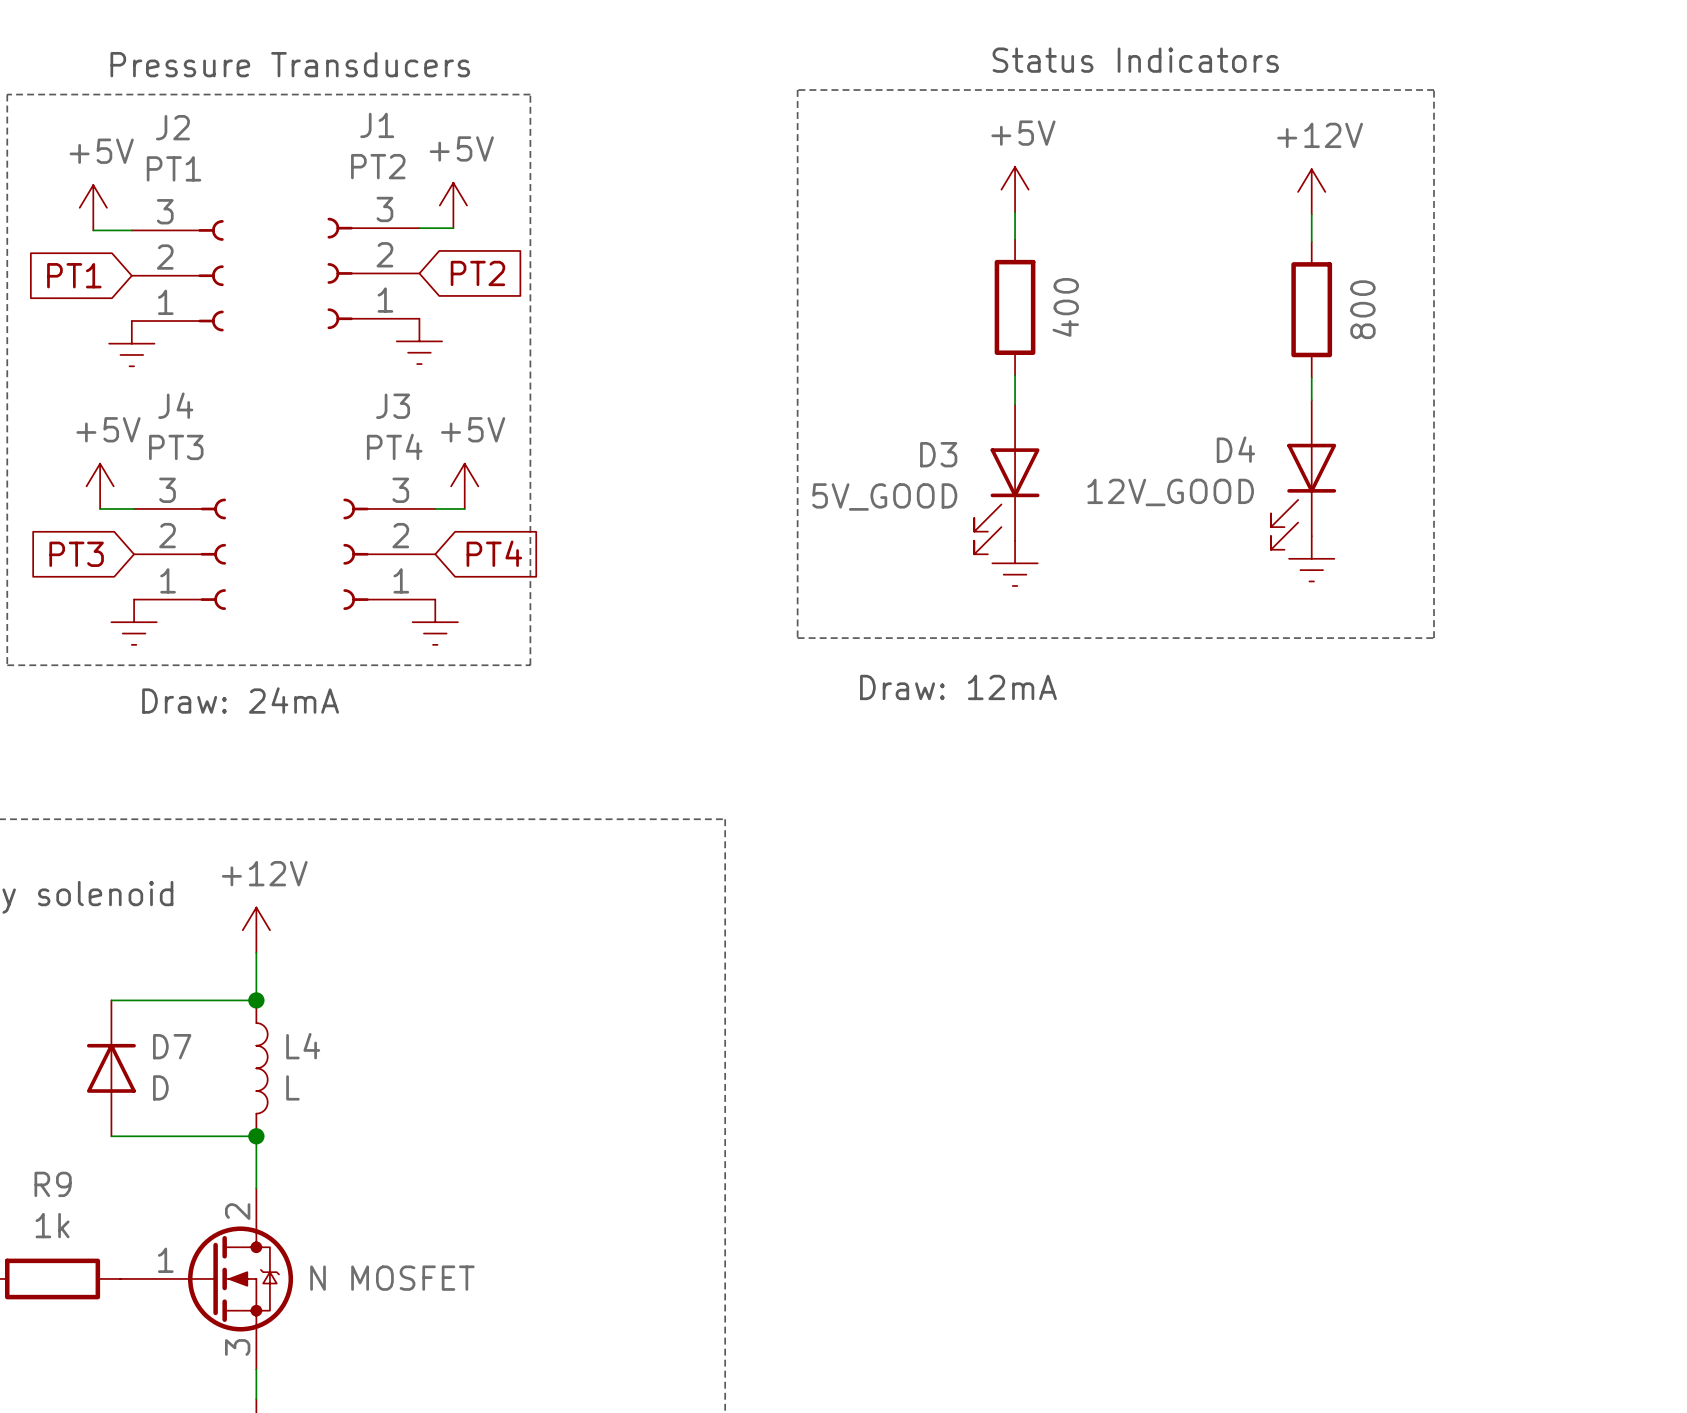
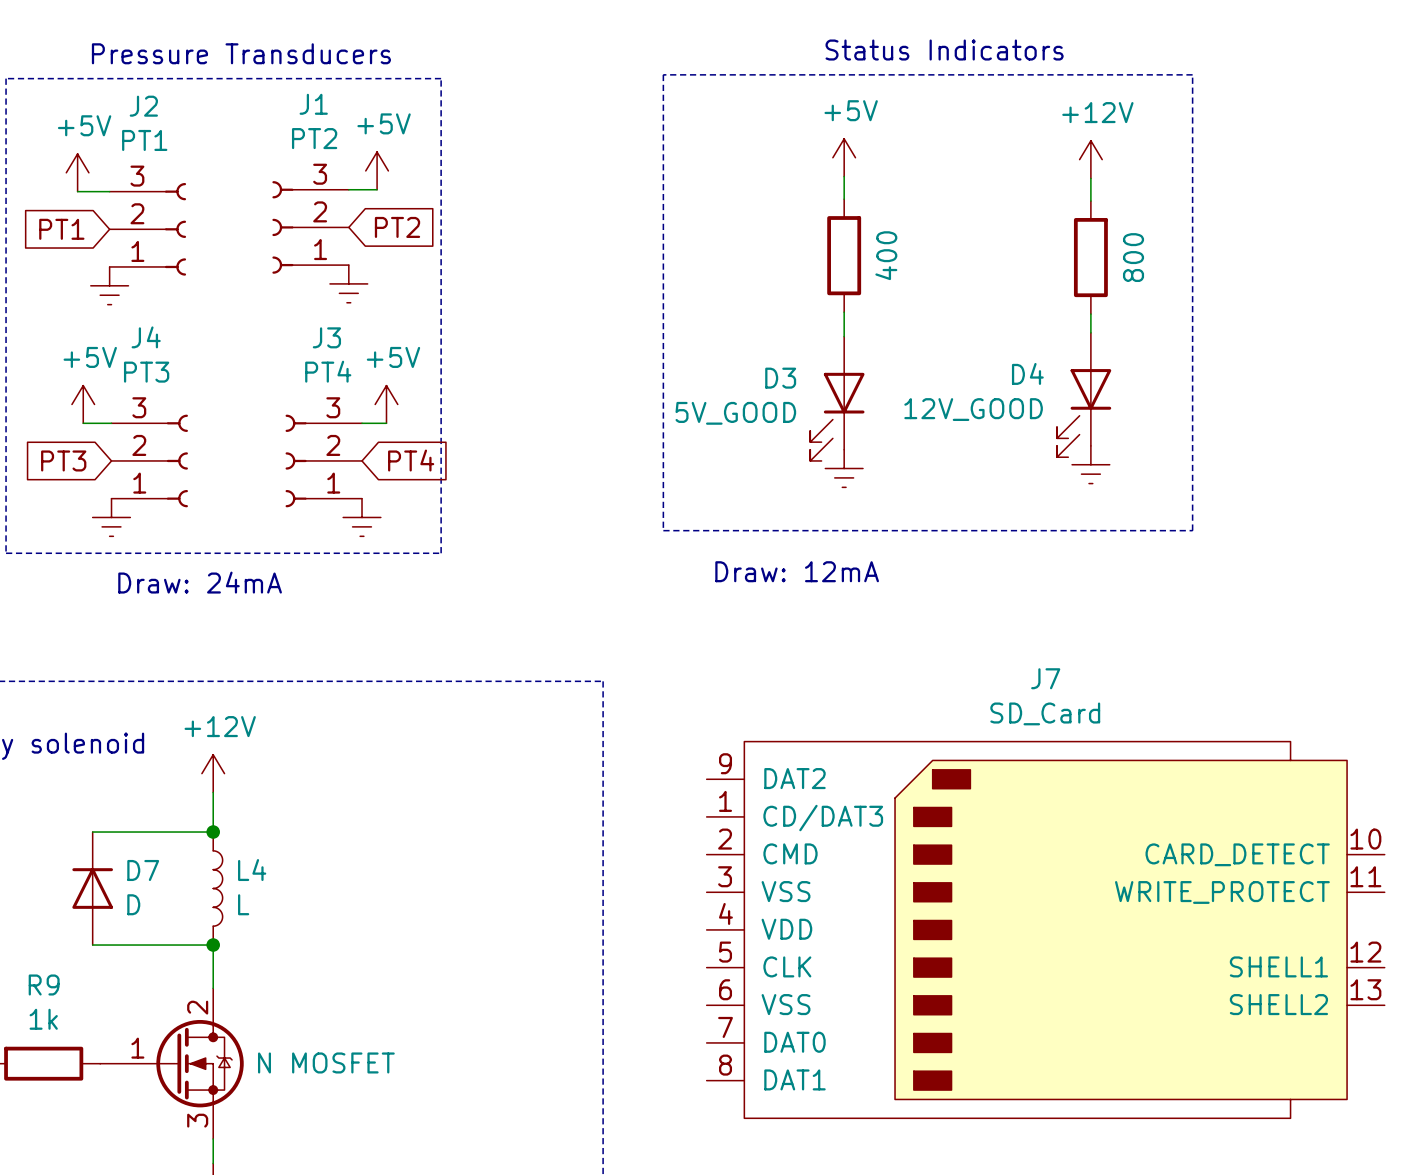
J7: none -> SD_Card (1045, 929)

